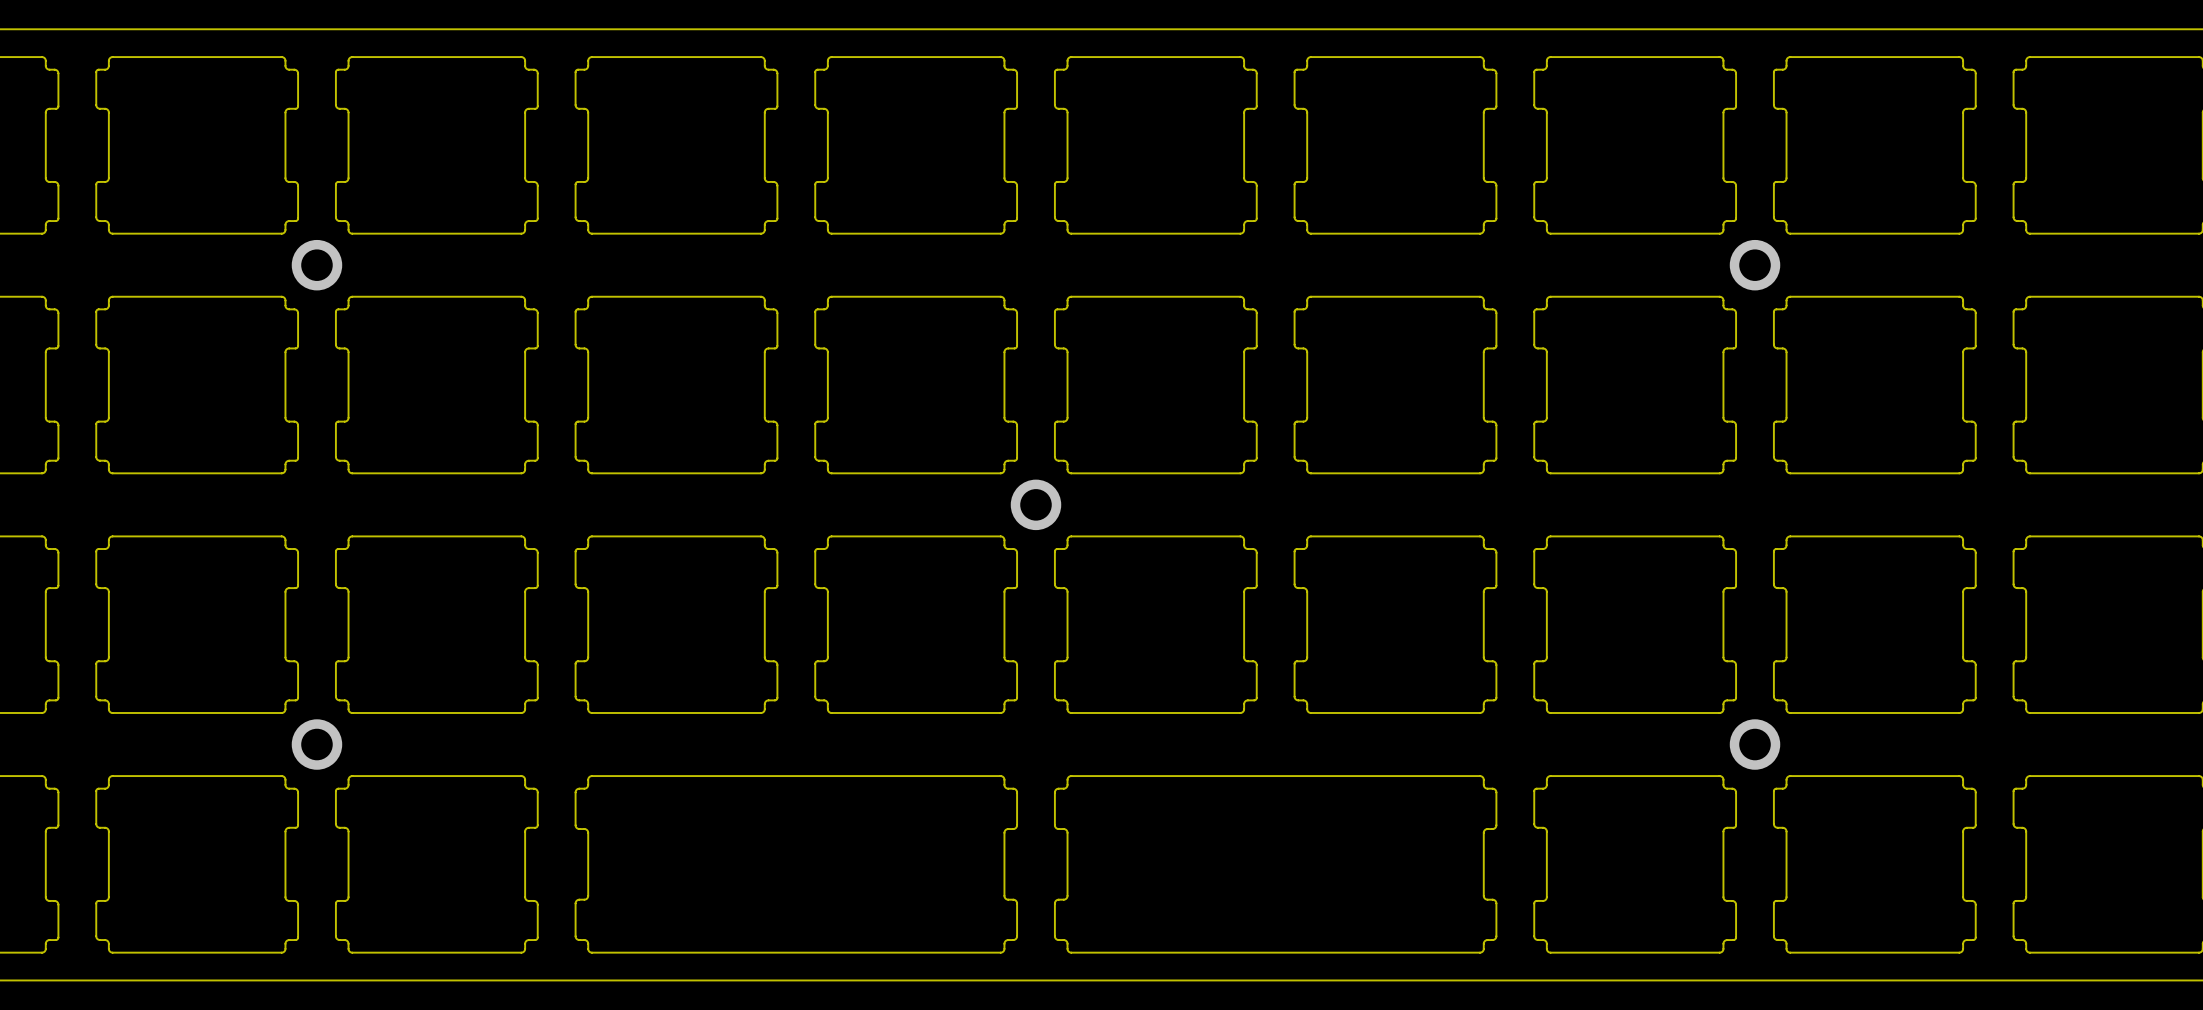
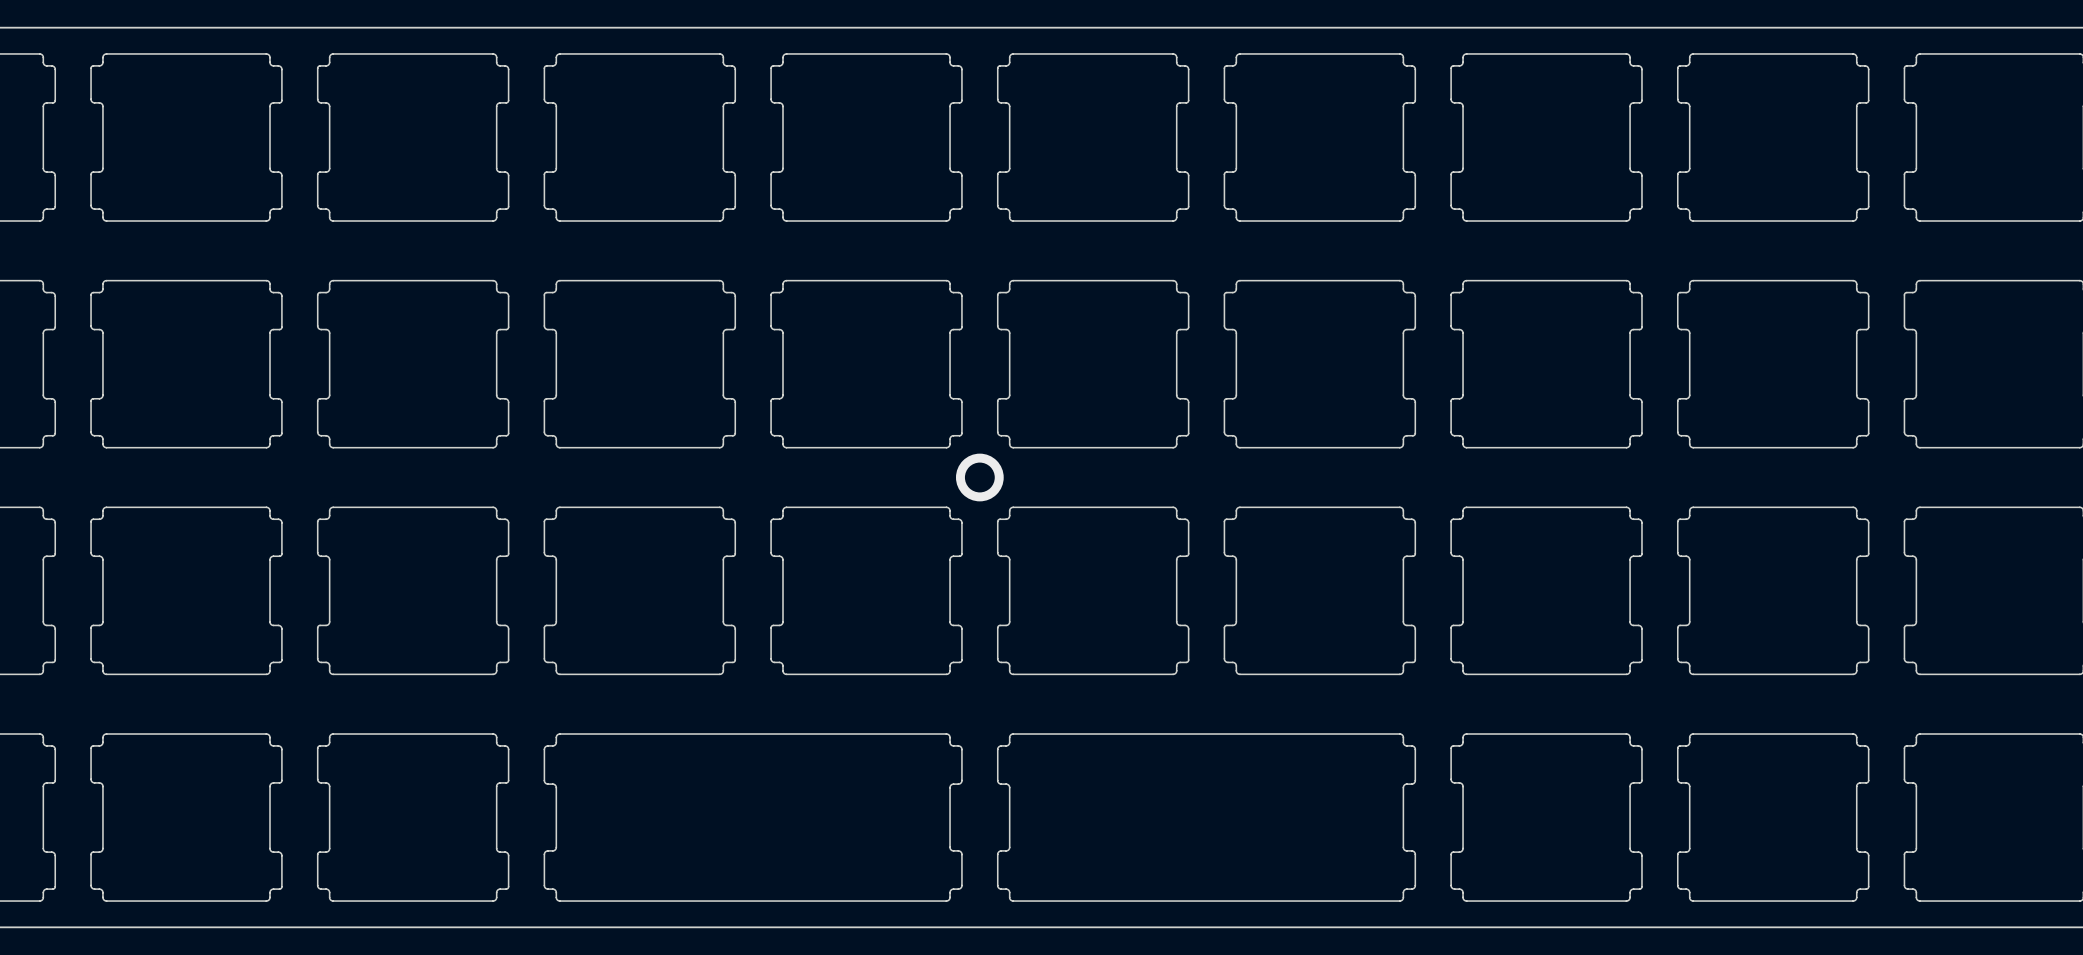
via: (316, 265) -> none
via: (1755, 265) -> none
via: (316, 744) -> none
via: (1755, 744) -> none

